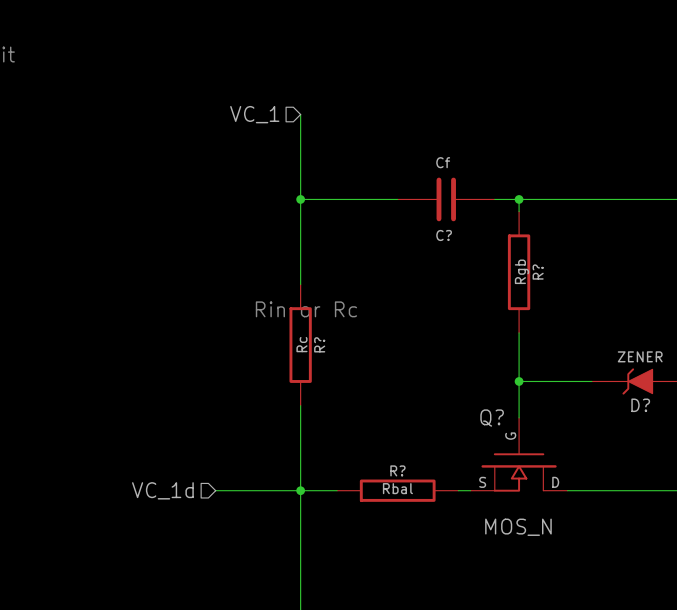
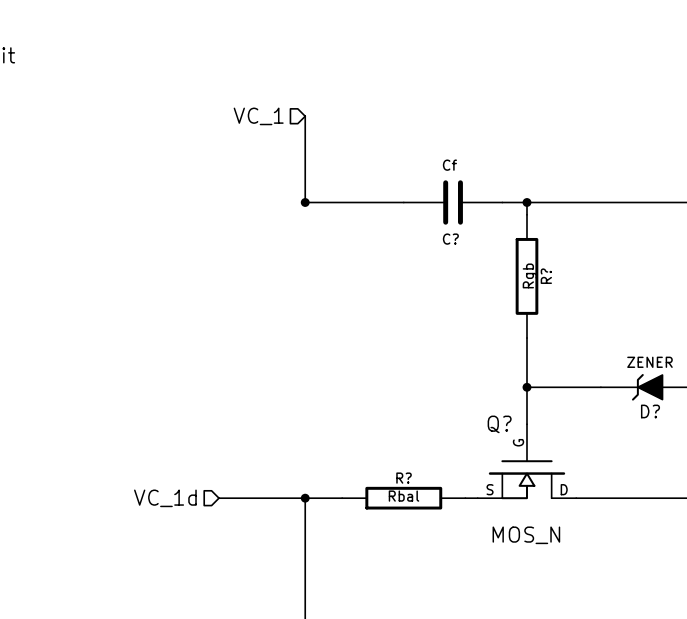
wire: (300, 199) (300, 284) -> none
text: Rin or Rc (306, 309) -> none
R?: Rc (300, 345) -> none
wire: (300, 405) (300, 490) -> none

